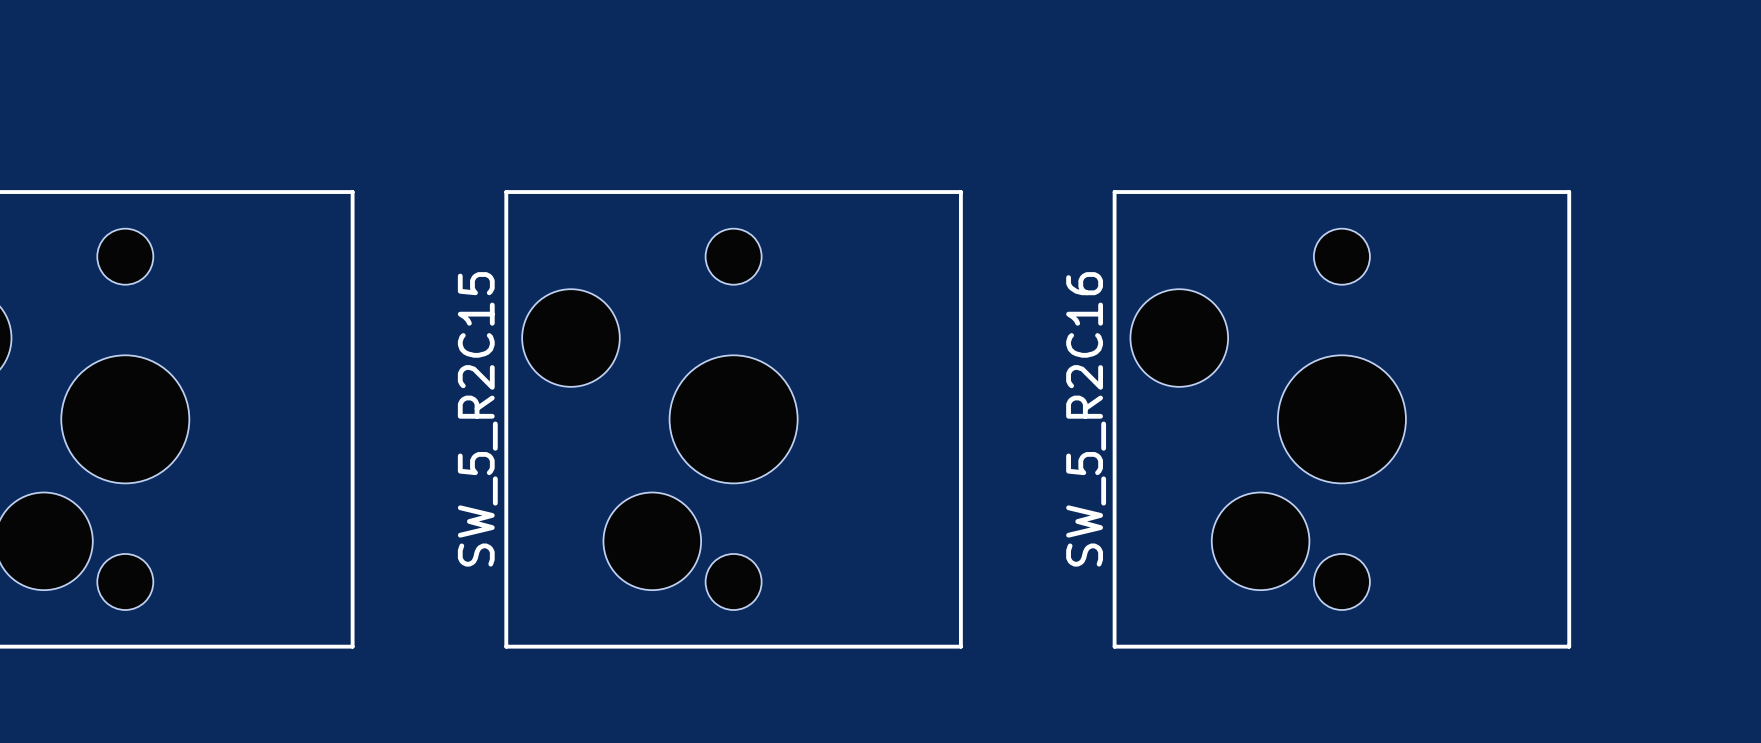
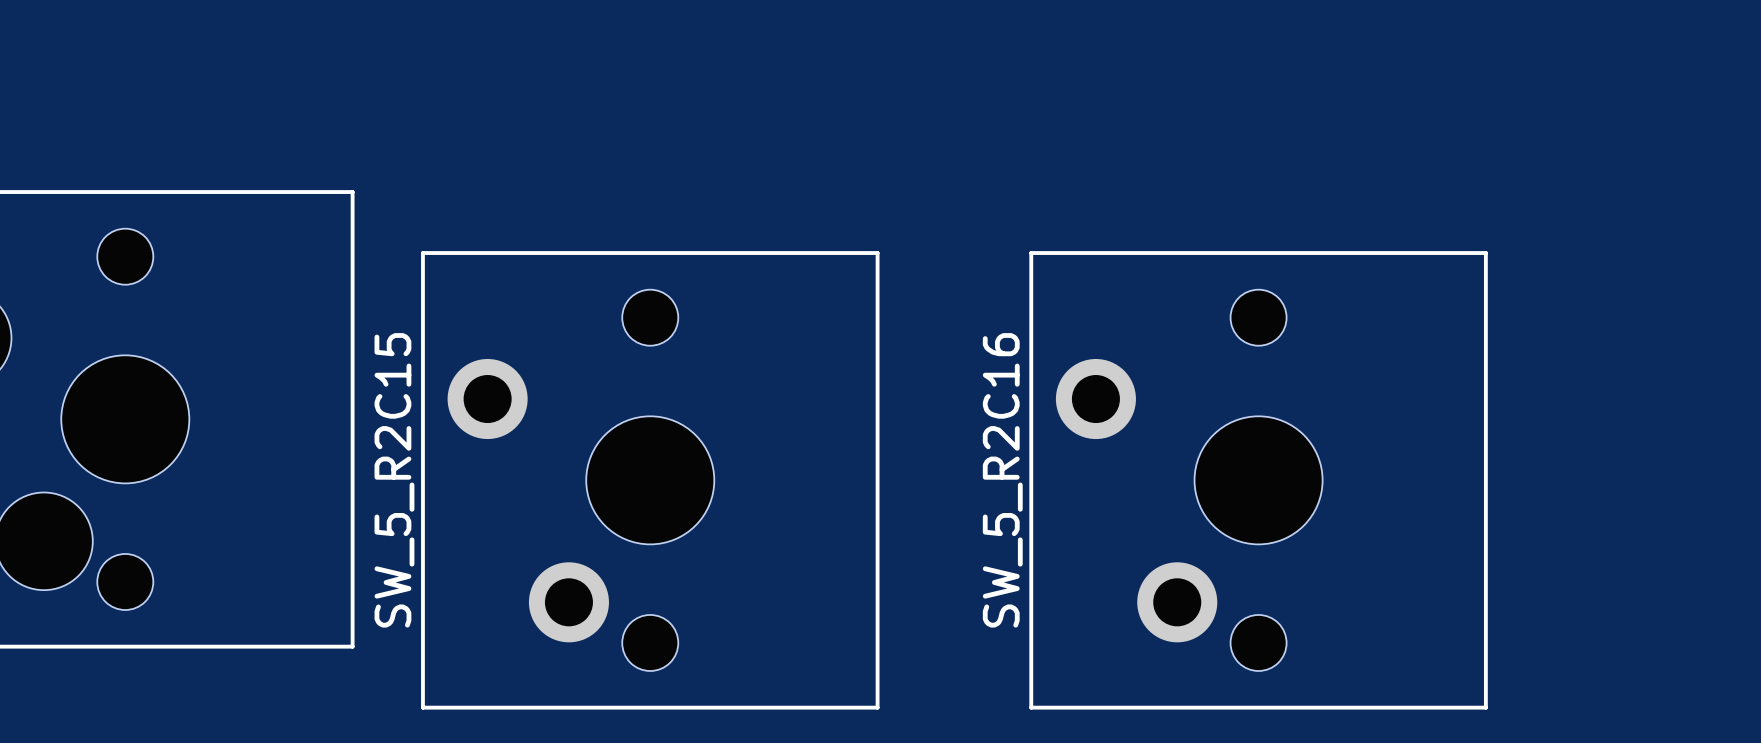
SW_5_R2C15 footprint: [504, 190, 963, 649] -> [421, 251, 880, 710]
SW_5_R2C16 footprint: [1112, 190, 1572, 649] -> [1029, 251, 1488, 710]

